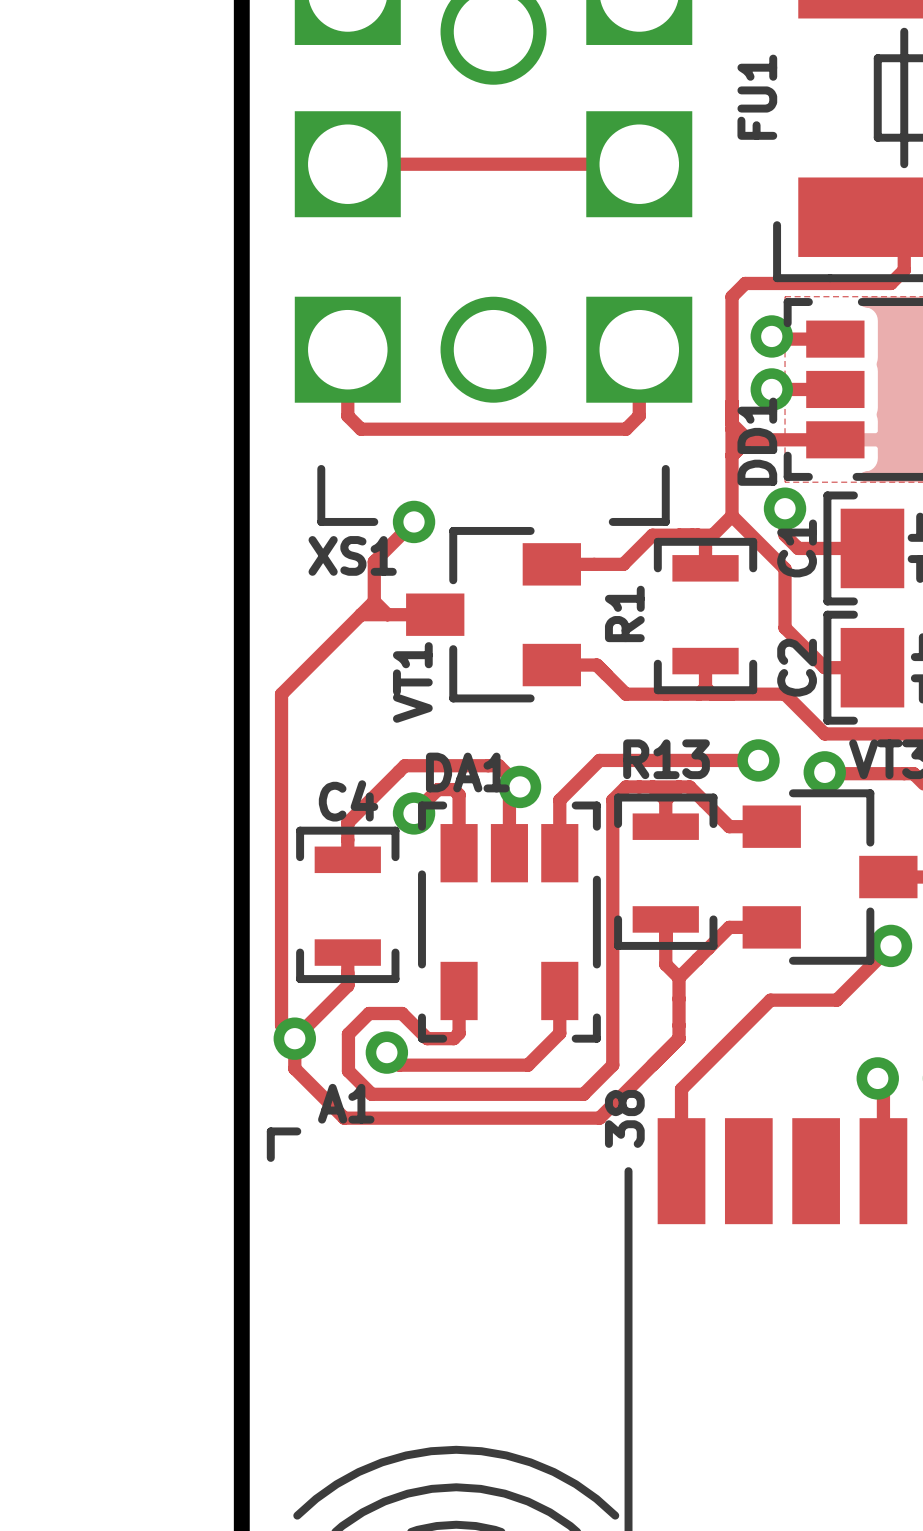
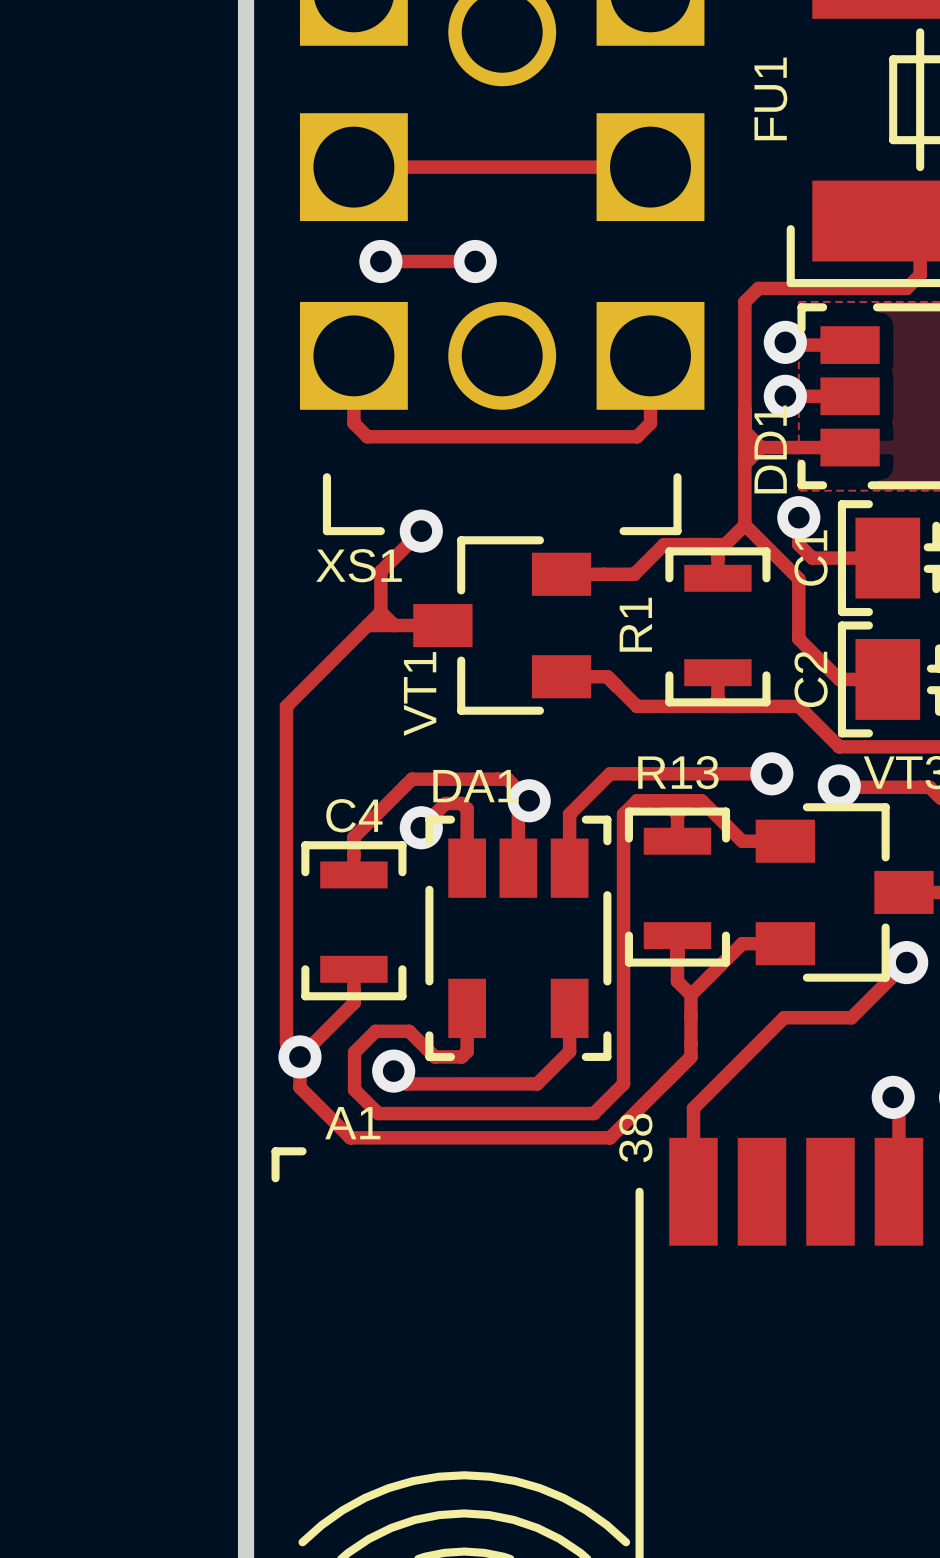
track: none -> (380, 261) (475, 261)
via: none -> (380, 261)
via: none -> (475, 261)

